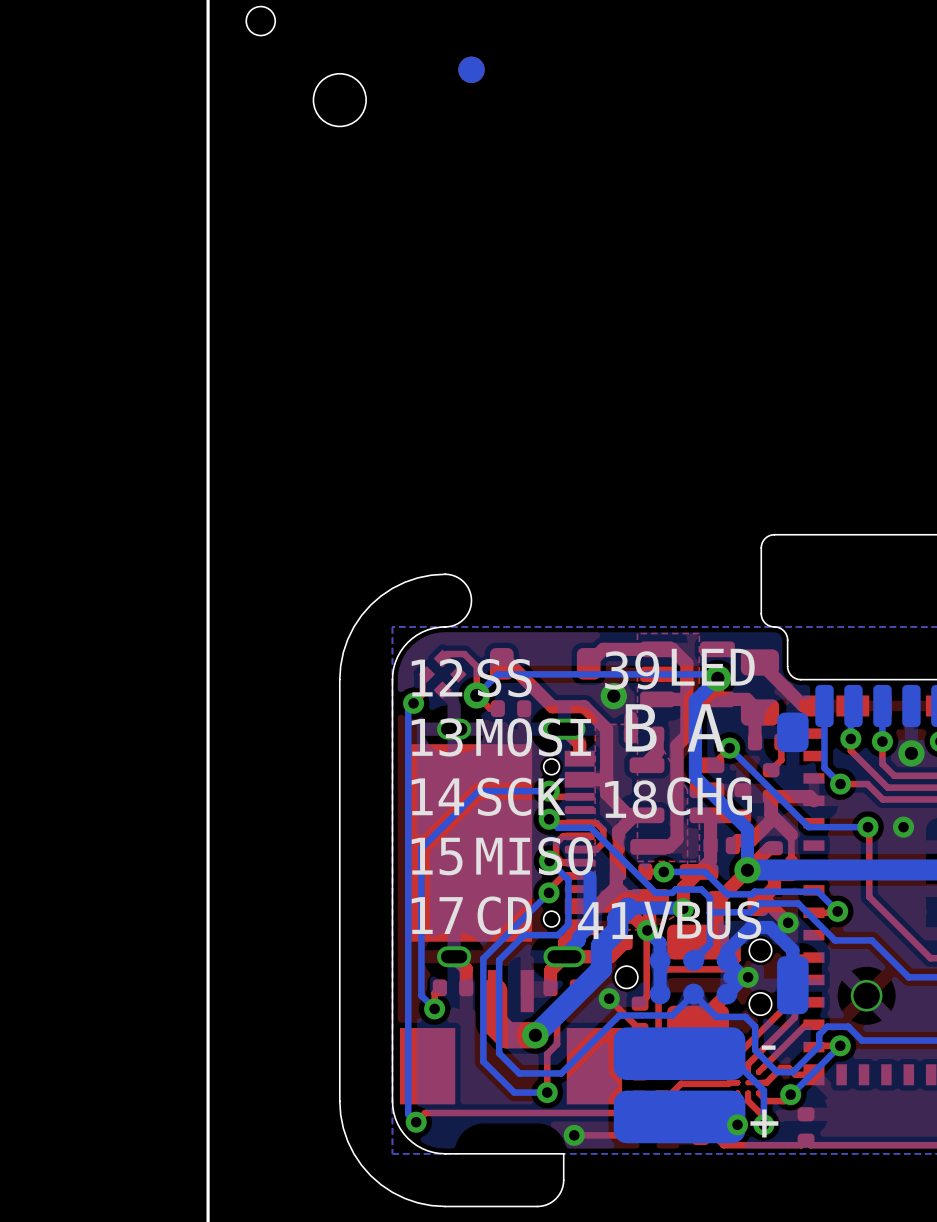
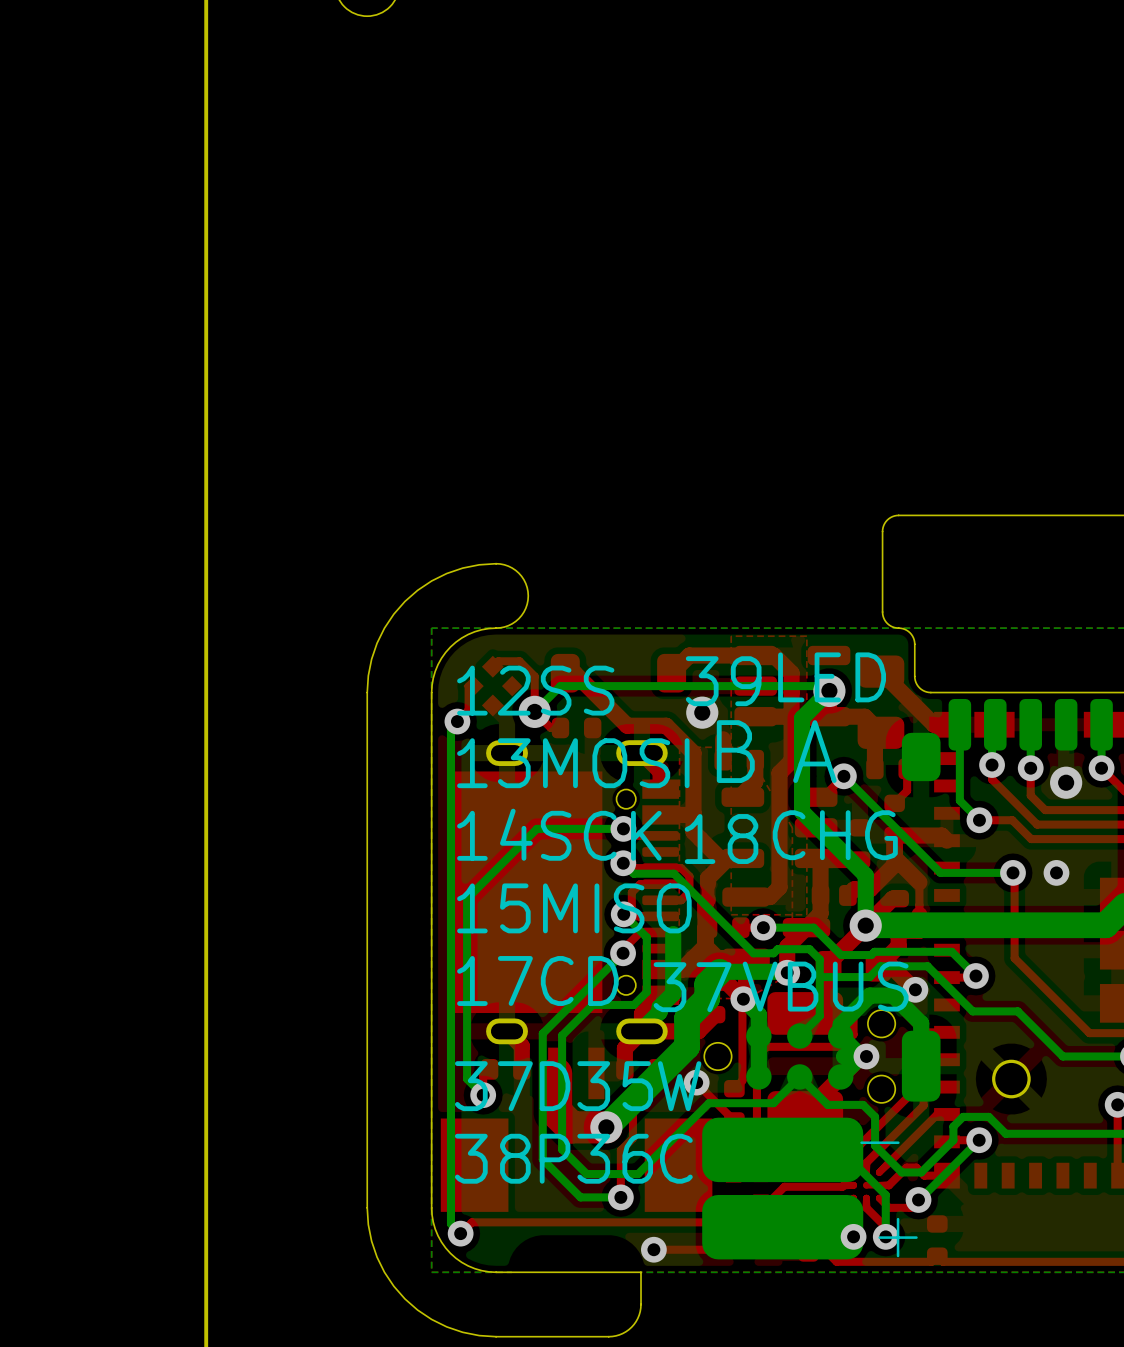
text: 41 (605, 920) -> 37 (692, 987)
text: none -> 37 (493, 1086)
text: none -> D (555, 1086)
text: none -> 35 (615, 1086)
text: none -> W (679, 1086)
text: none -> 38 (492, 1158)
text: none -> P (555, 1158)
text: none -> 36 (615, 1158)
text: none -> C (676, 1158)

